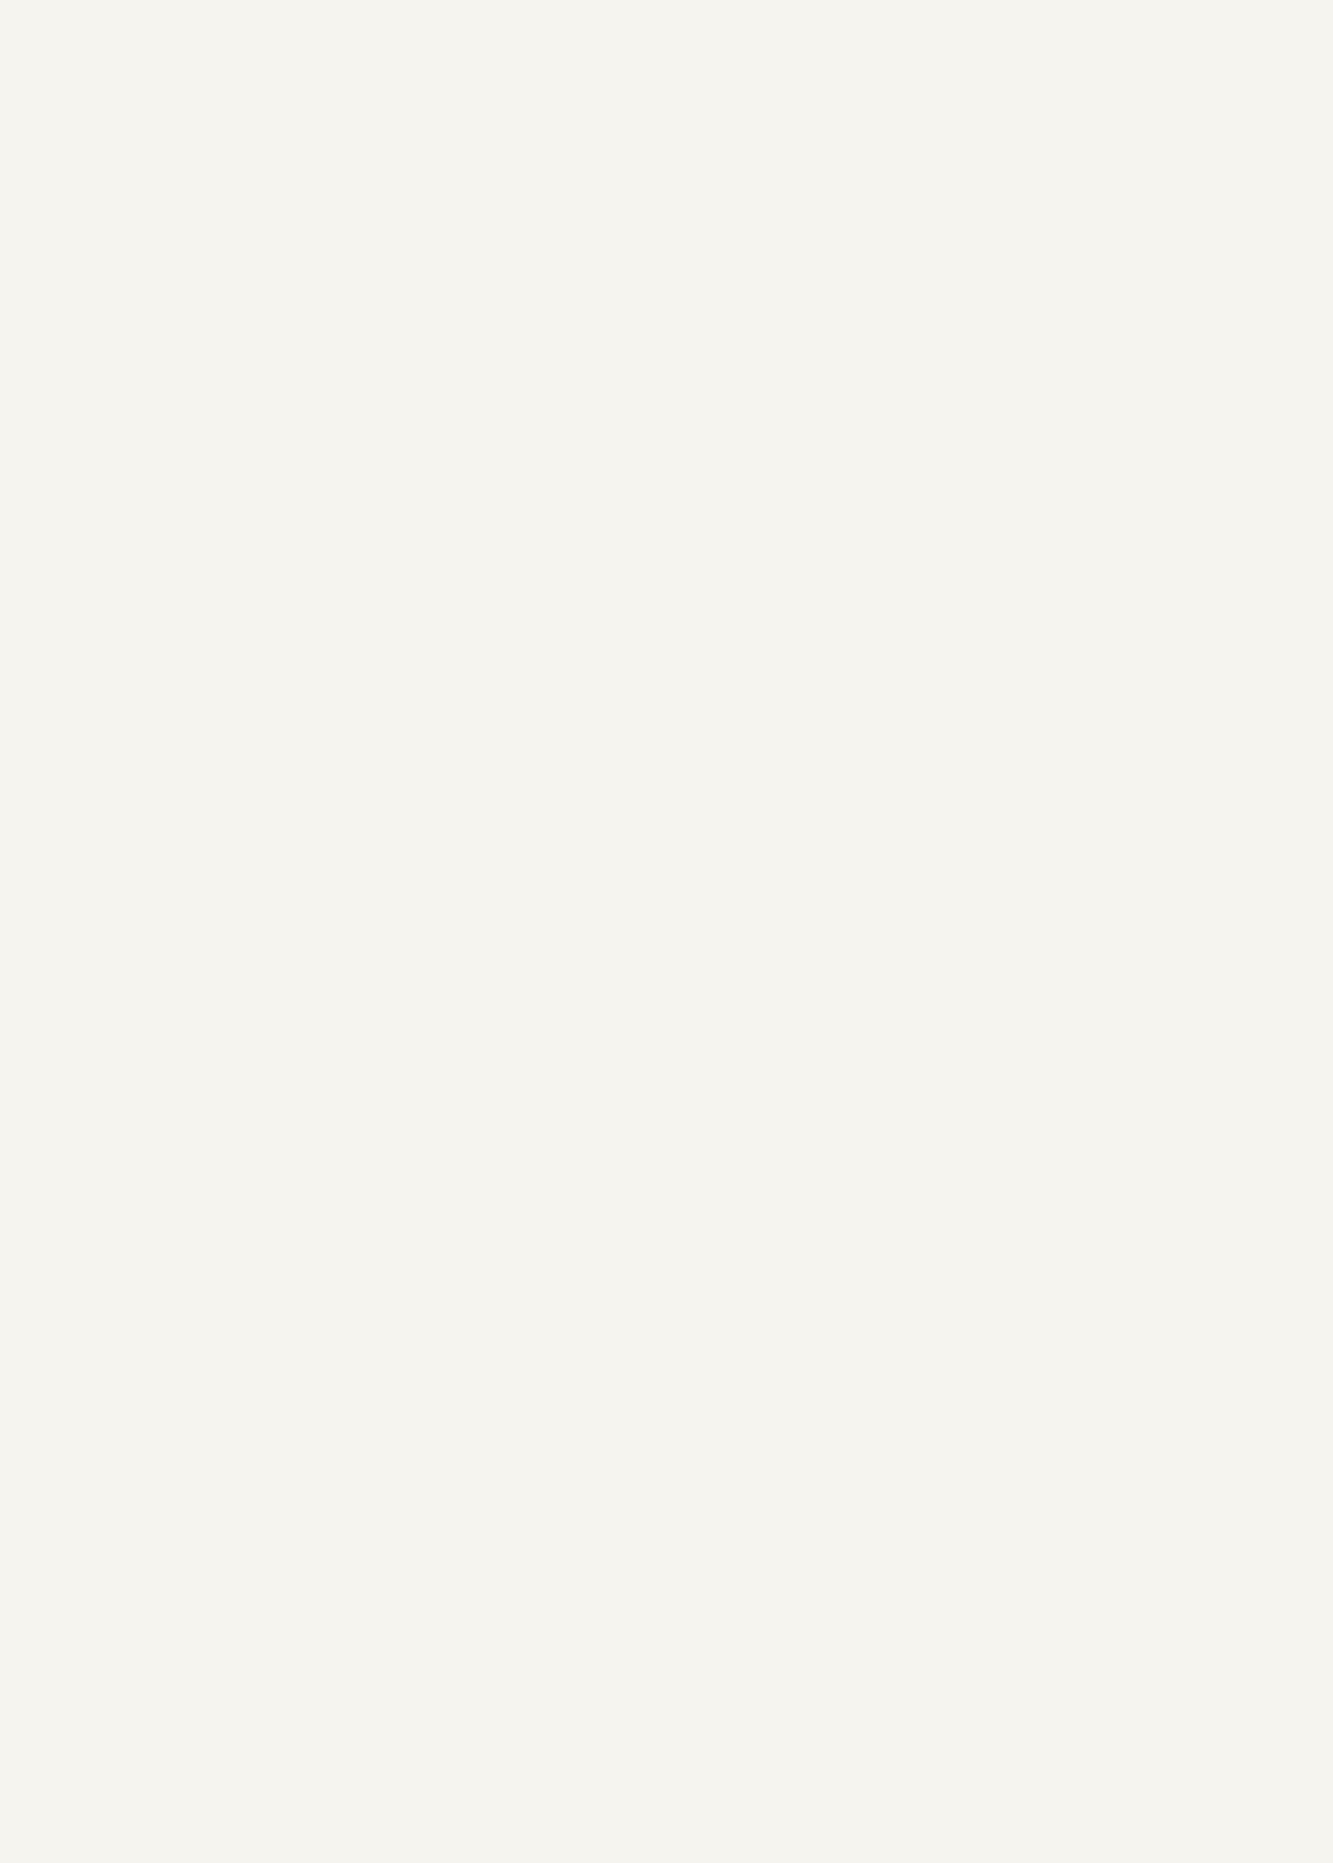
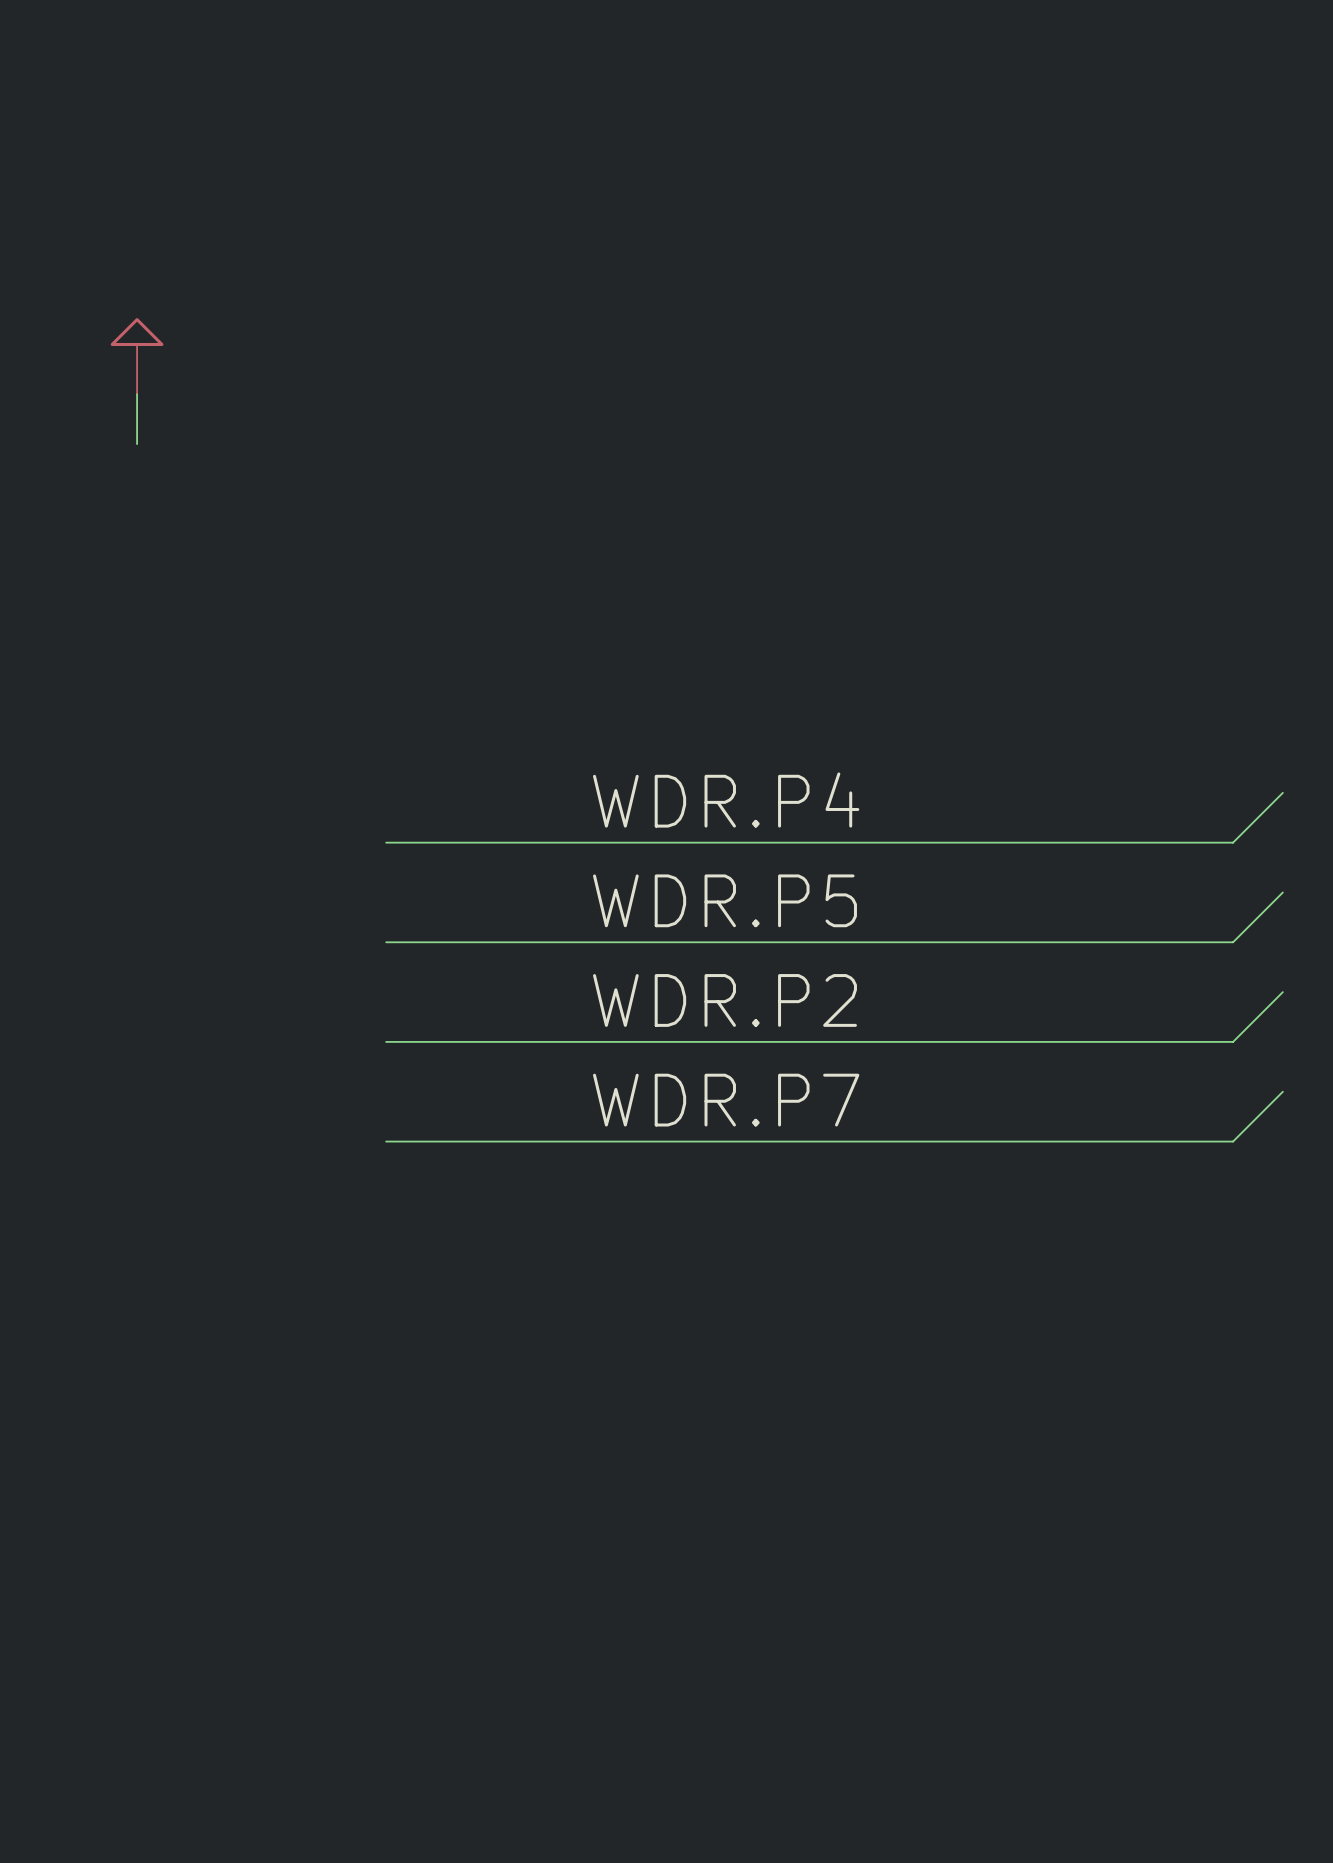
power symbol: none -> (137, 356)
wire: none -> (137, 394) (137, 444)
wire: none -> (1282, 792) (1233, 842) (386, 842)
label: none -> WDR.P4 (726, 800)
wire: none -> (1282, 892) (1233, 942) (386, 942)
label: none -> WDR.P5 (724, 900)
wire: none -> (1282, 992) (1233, 1041) (386, 1041)
label: none -> WDR.P2 (724, 1000)
wire: none -> (1282, 1091) (1233, 1141) (386, 1141)
label: none -> WDR.P7 (726, 1100)

